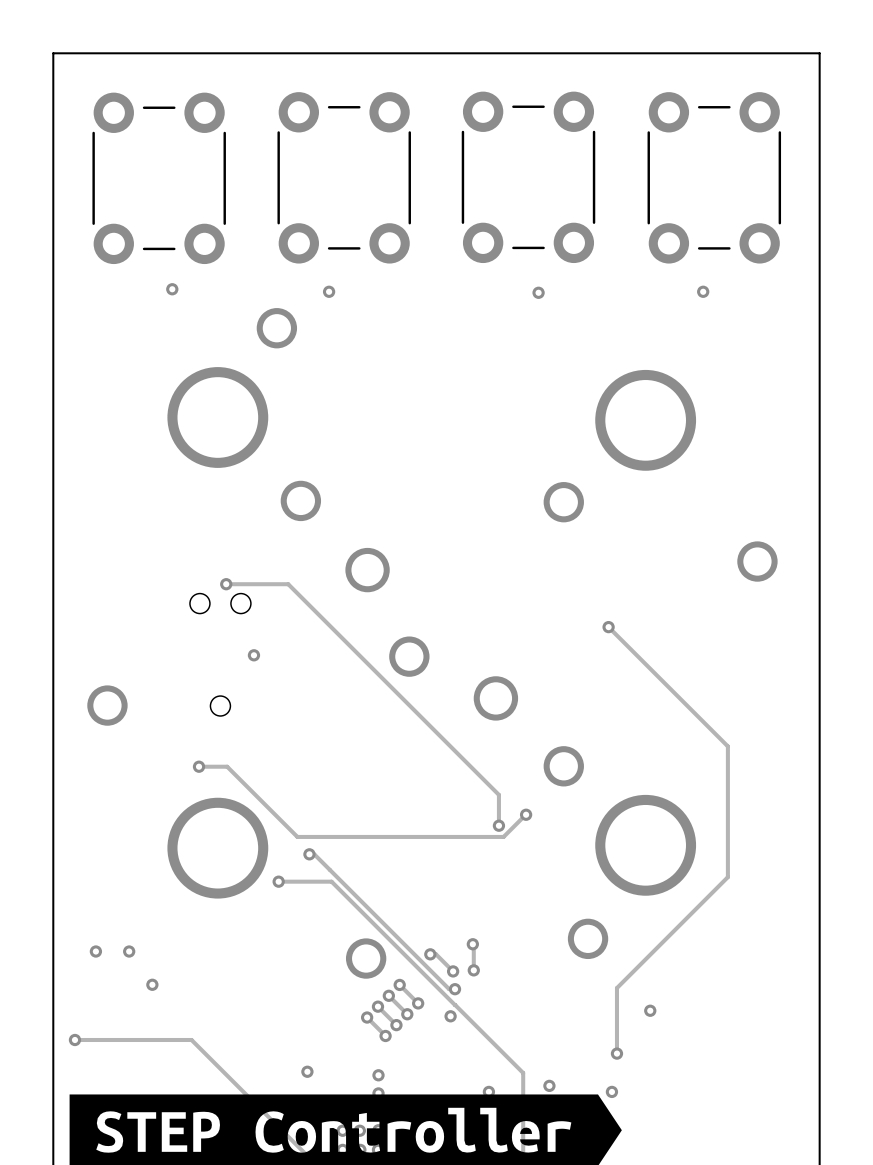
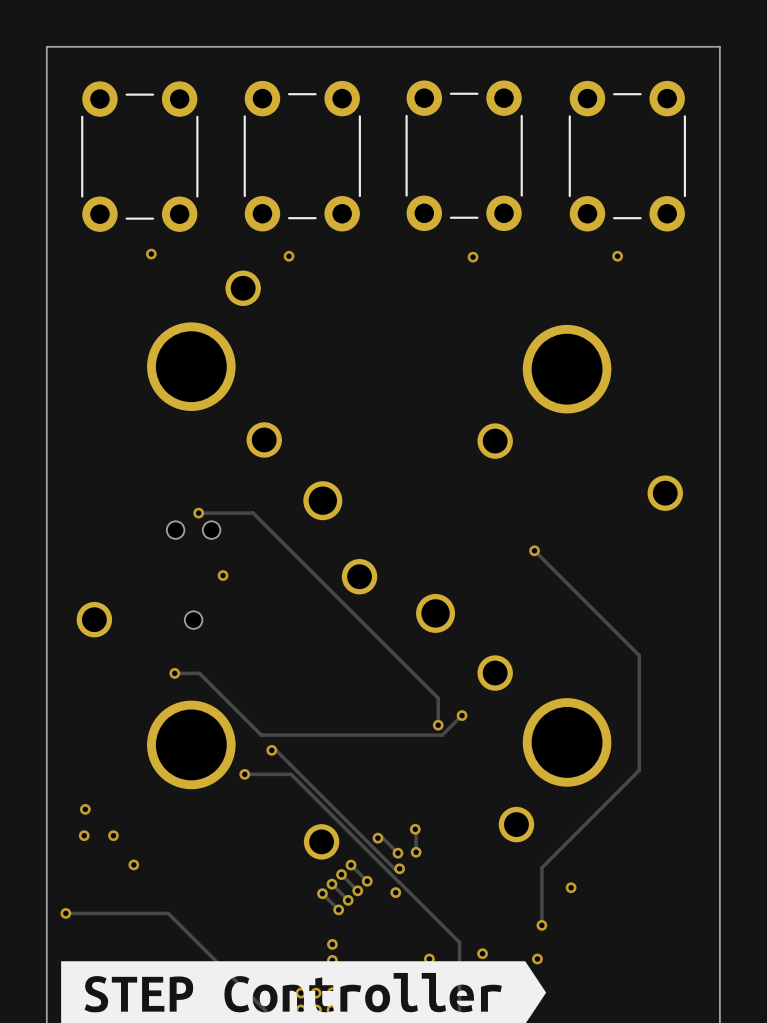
via: none -> (85, 809)
via: (307, 1071) -> none

